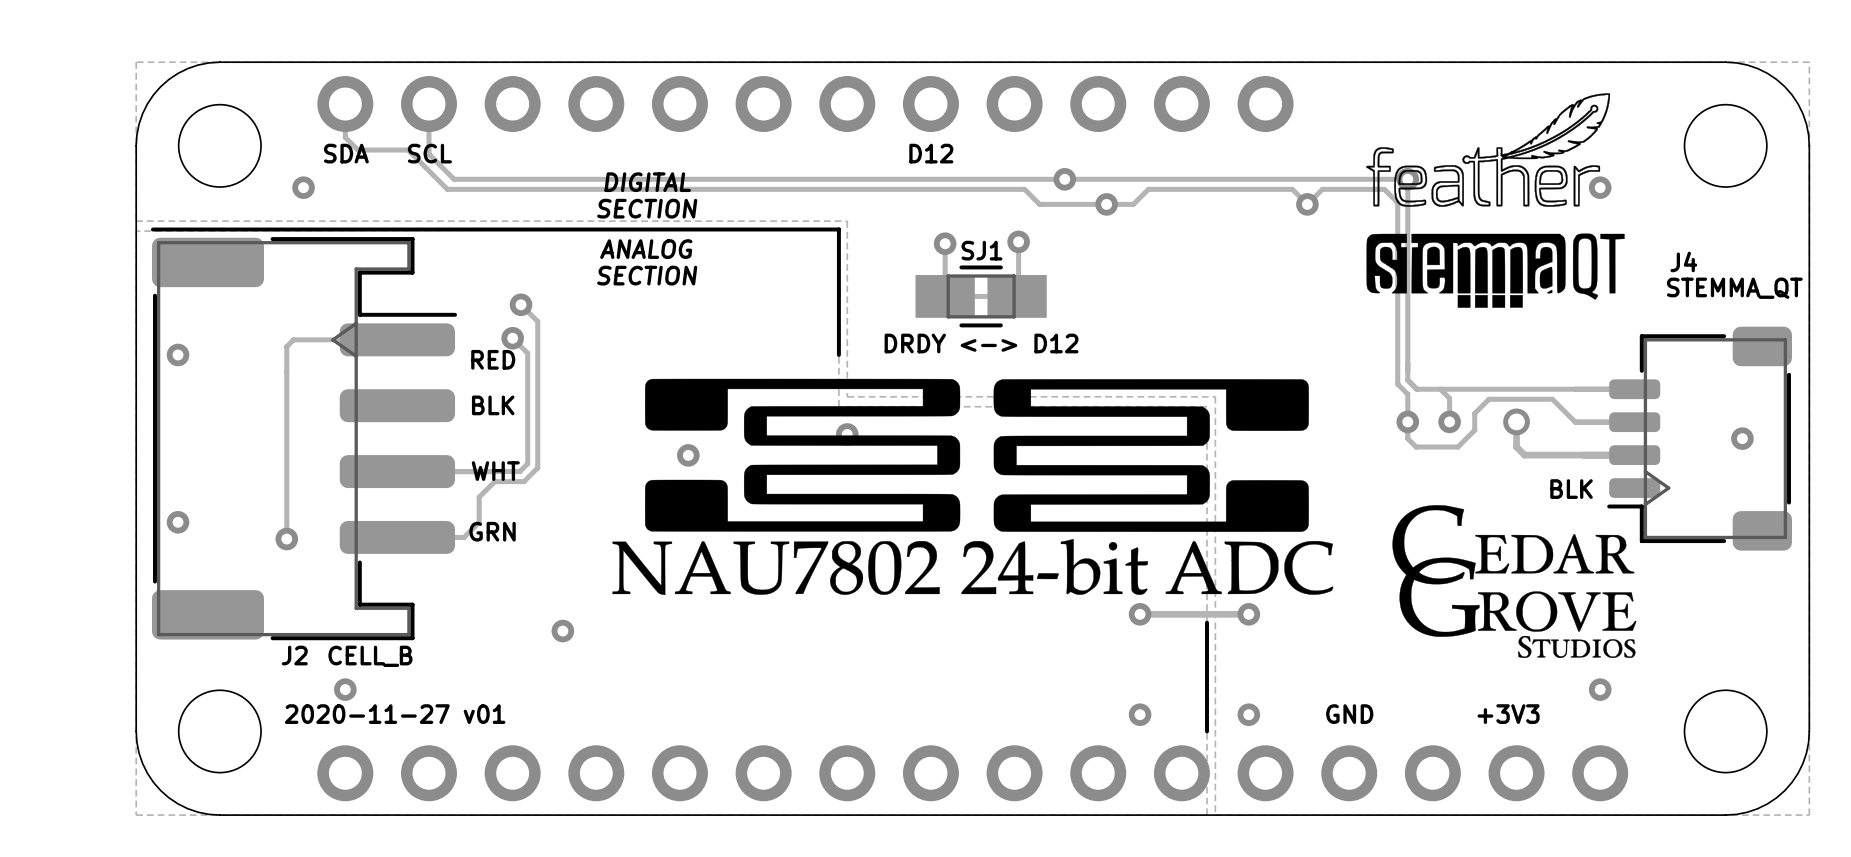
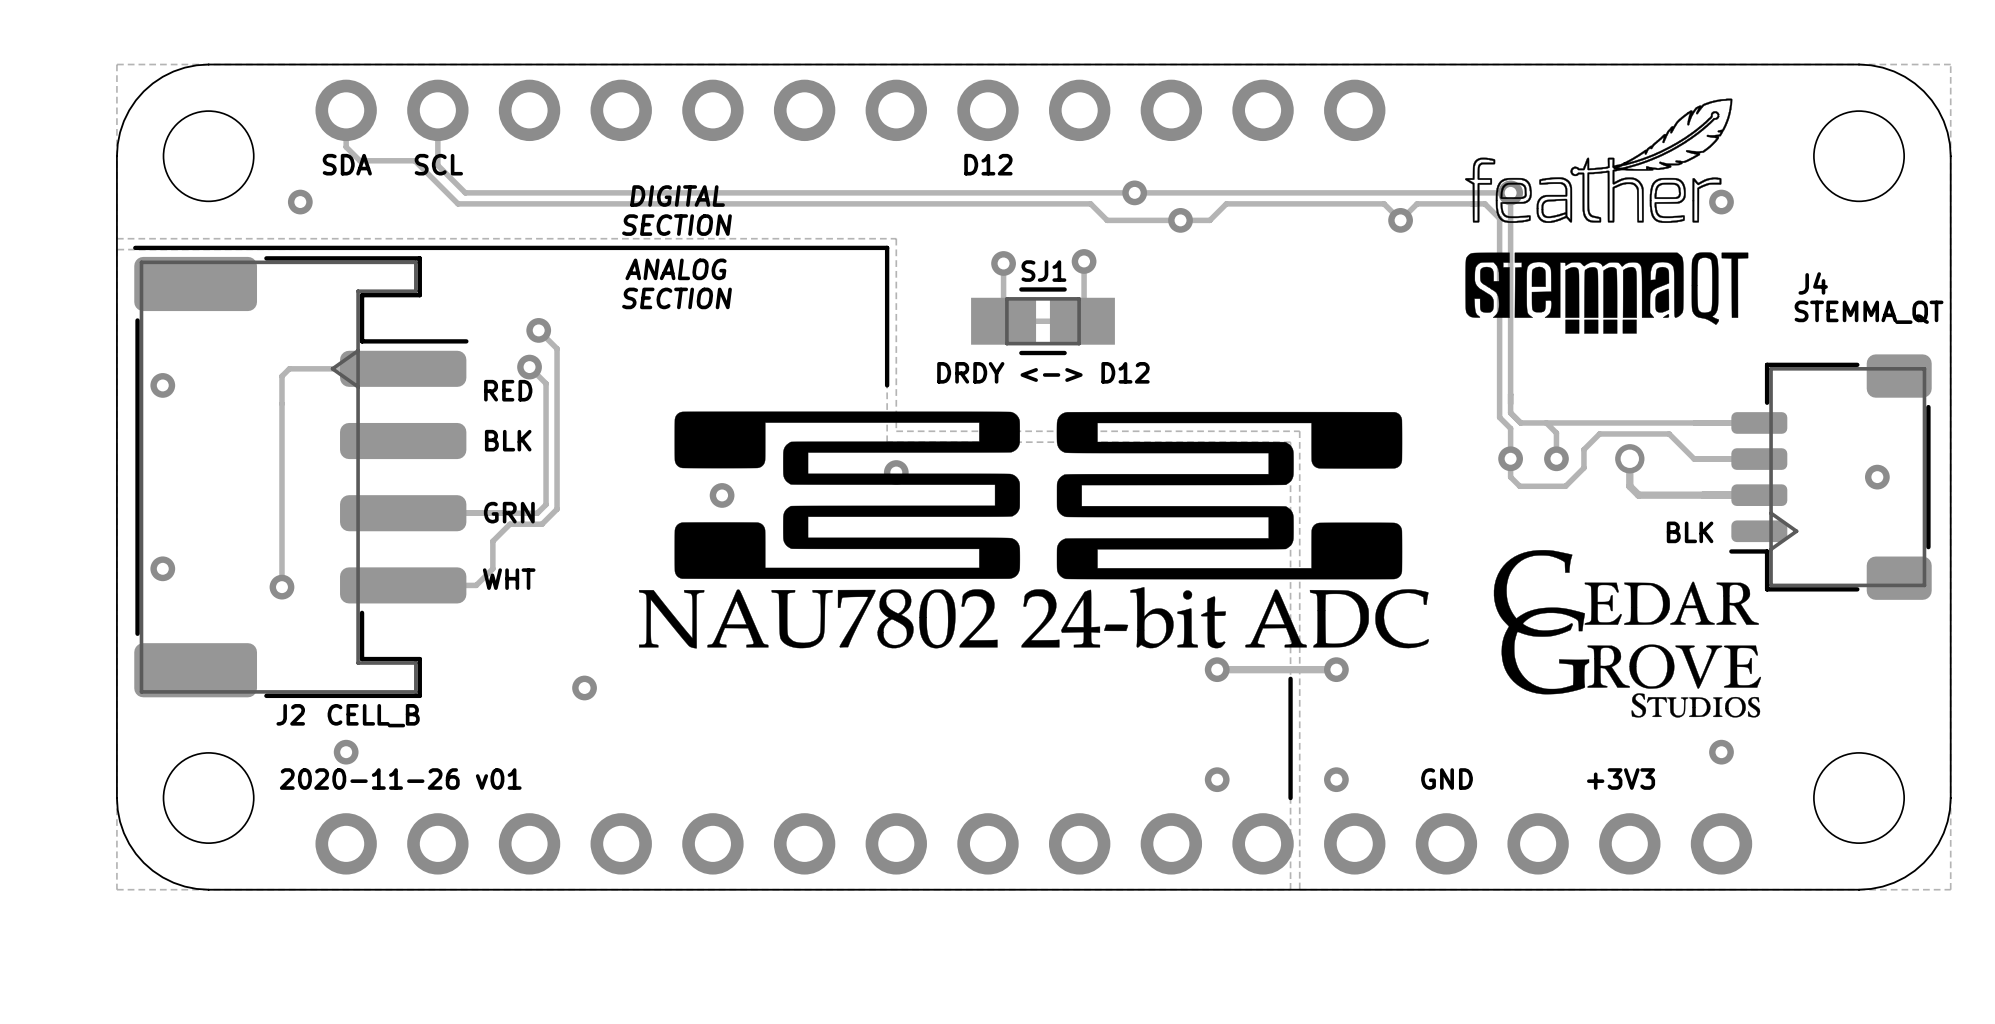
text: WHT (495, 471) -> GRN (509, 512)
text: GRN (492, 531) -> WHT (509, 579)
text: 2020-11-27 v01 (395, 714) -> 2020-11-26 v01 (400, 779)

